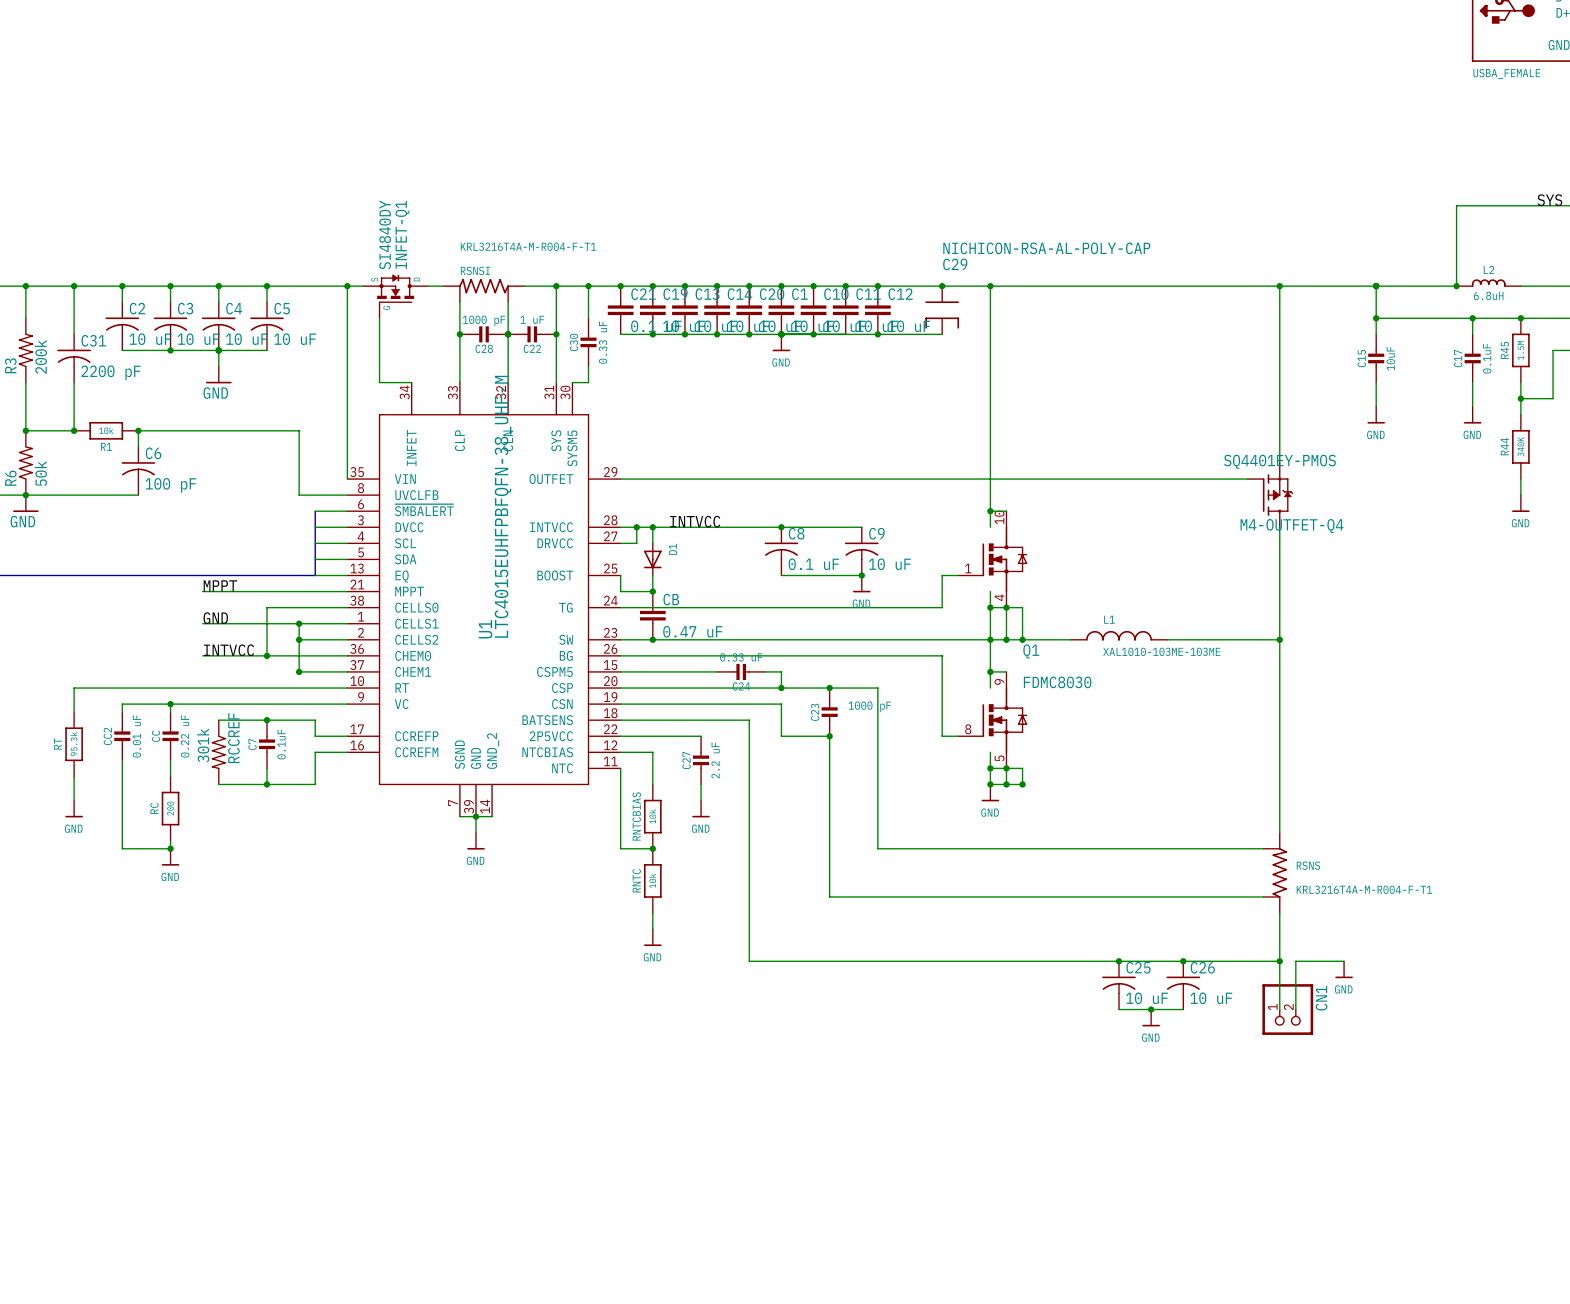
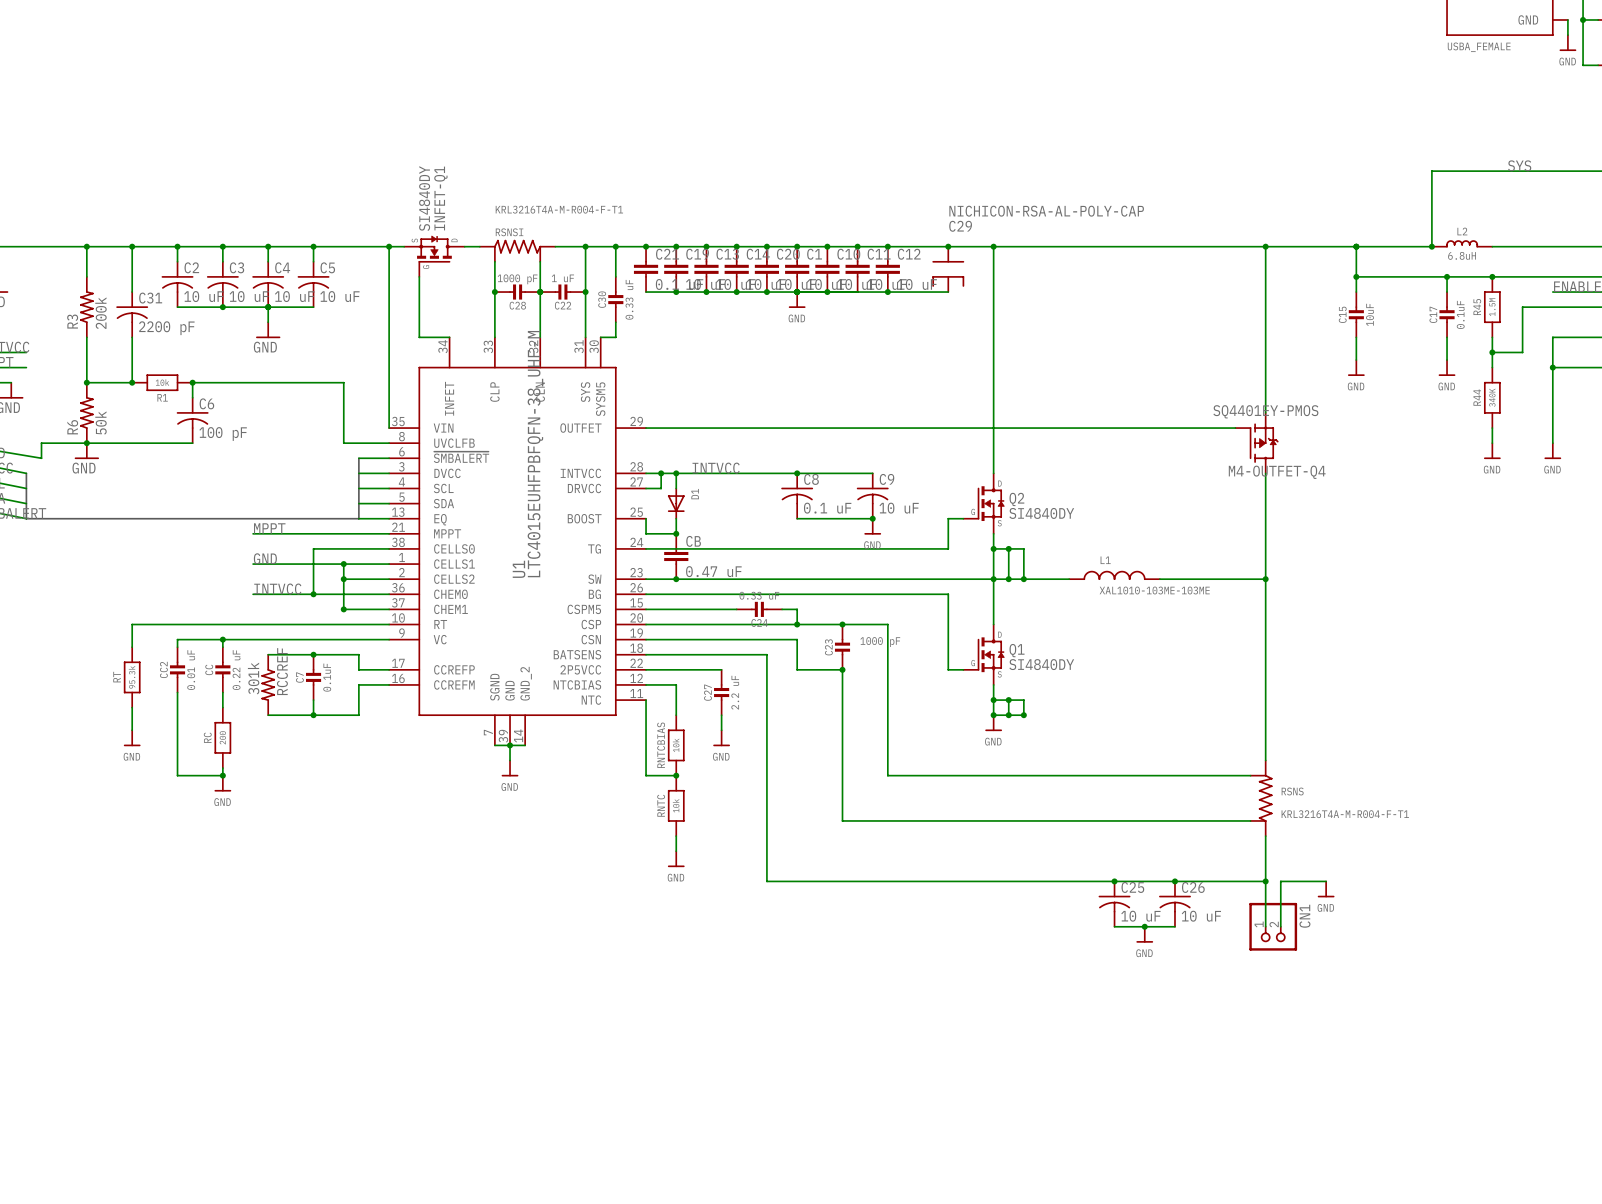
Q1 symbol: [958, 511, 1028, 769] -> [963, 624, 1005, 685]
wire: (990, 511) (1006, 511) -> none
junction: (990, 511) -> none
Q2: none -> SI4840DY (984, 503)
Q1 name position: Q1 (1031, 651) -> Q1 (1017, 650)
wire: (990, 671) (1006, 671) -> none
junction: (990, 671) -> none
Q1 value: FDMC8030 (1057, 682) -> SI4840DY (1041, 664)

